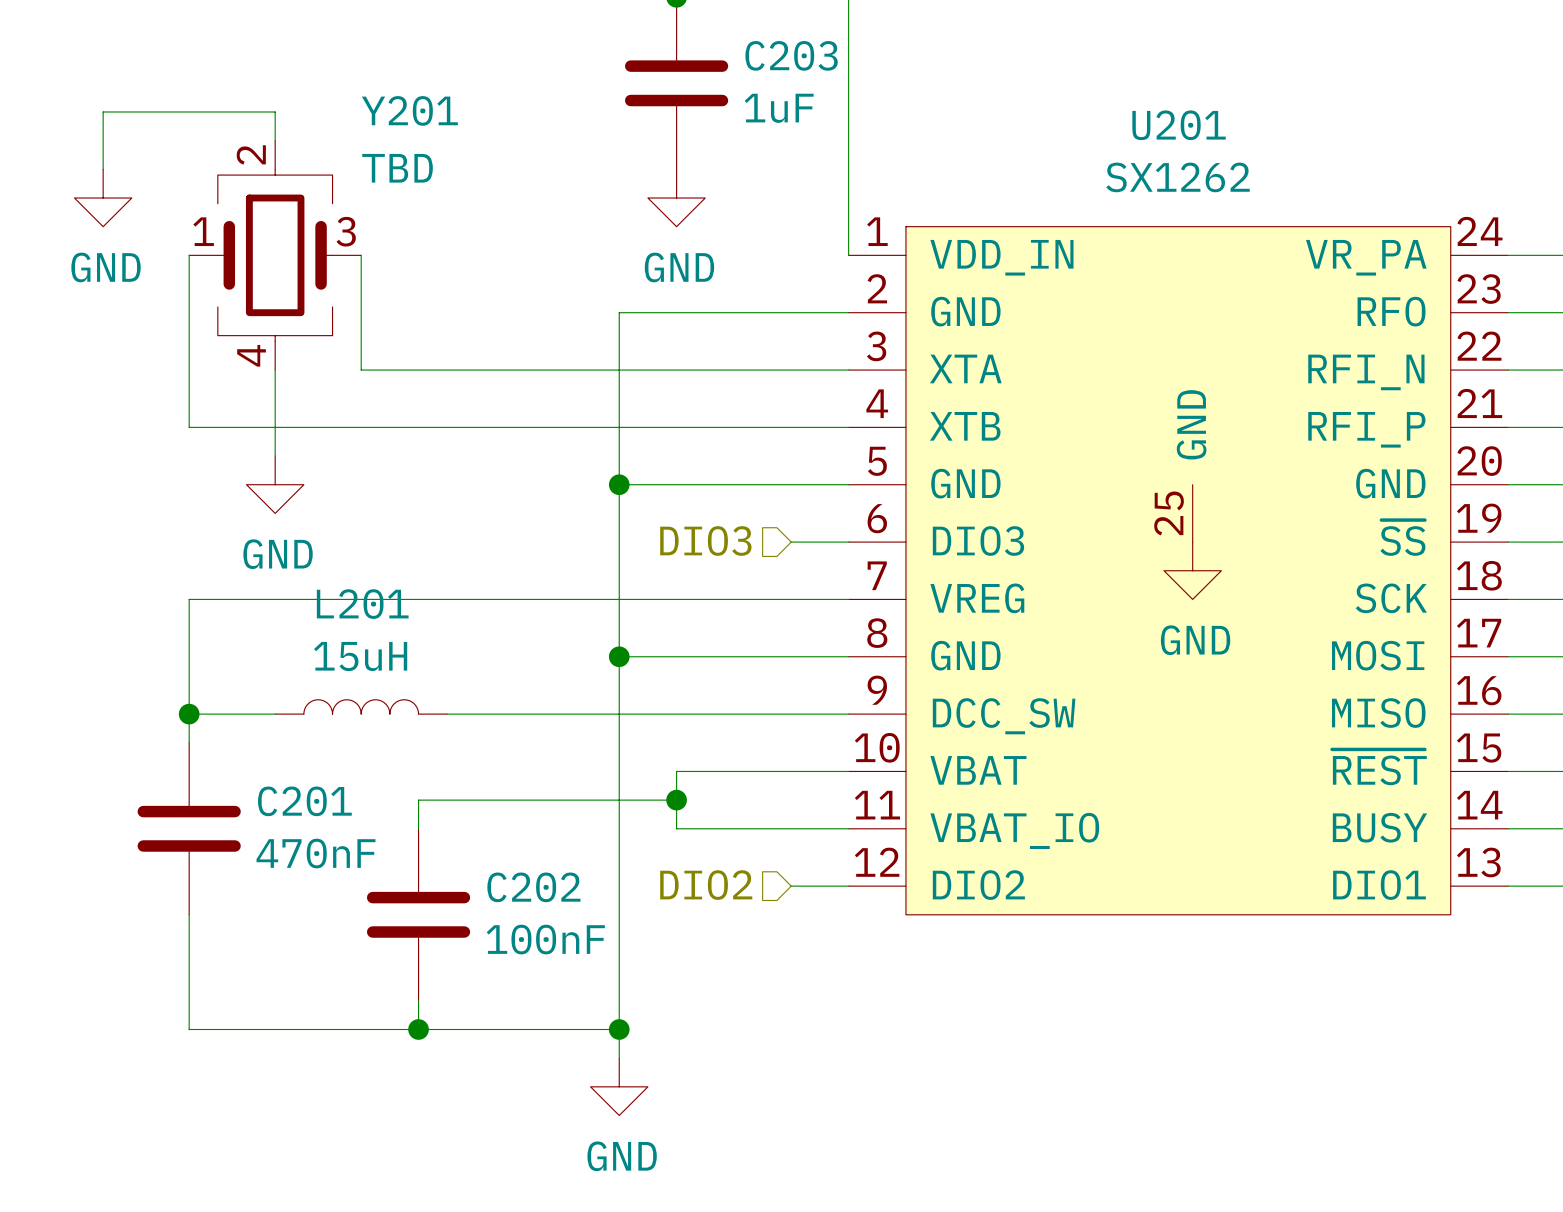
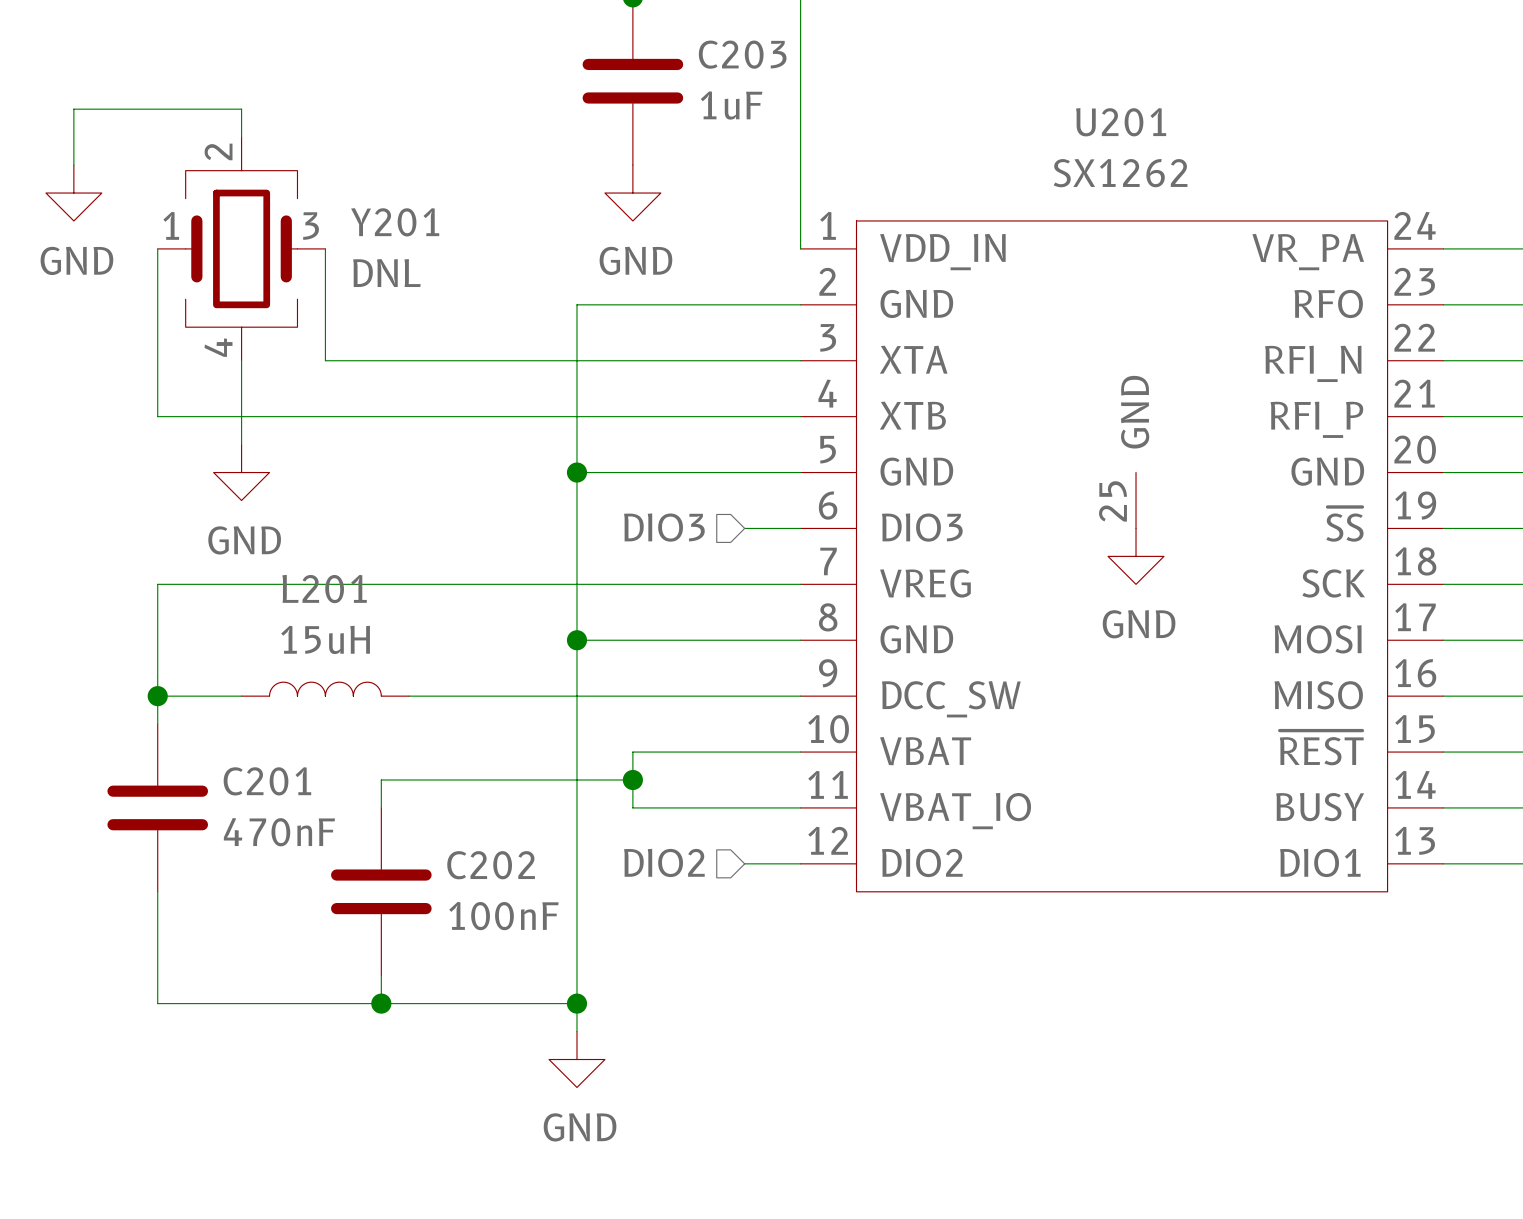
Y201 name position: Y201 (409, 110) -> Y201 (395, 222)
Y201 value: TBD (397, 168) -> DNL (386, 273)

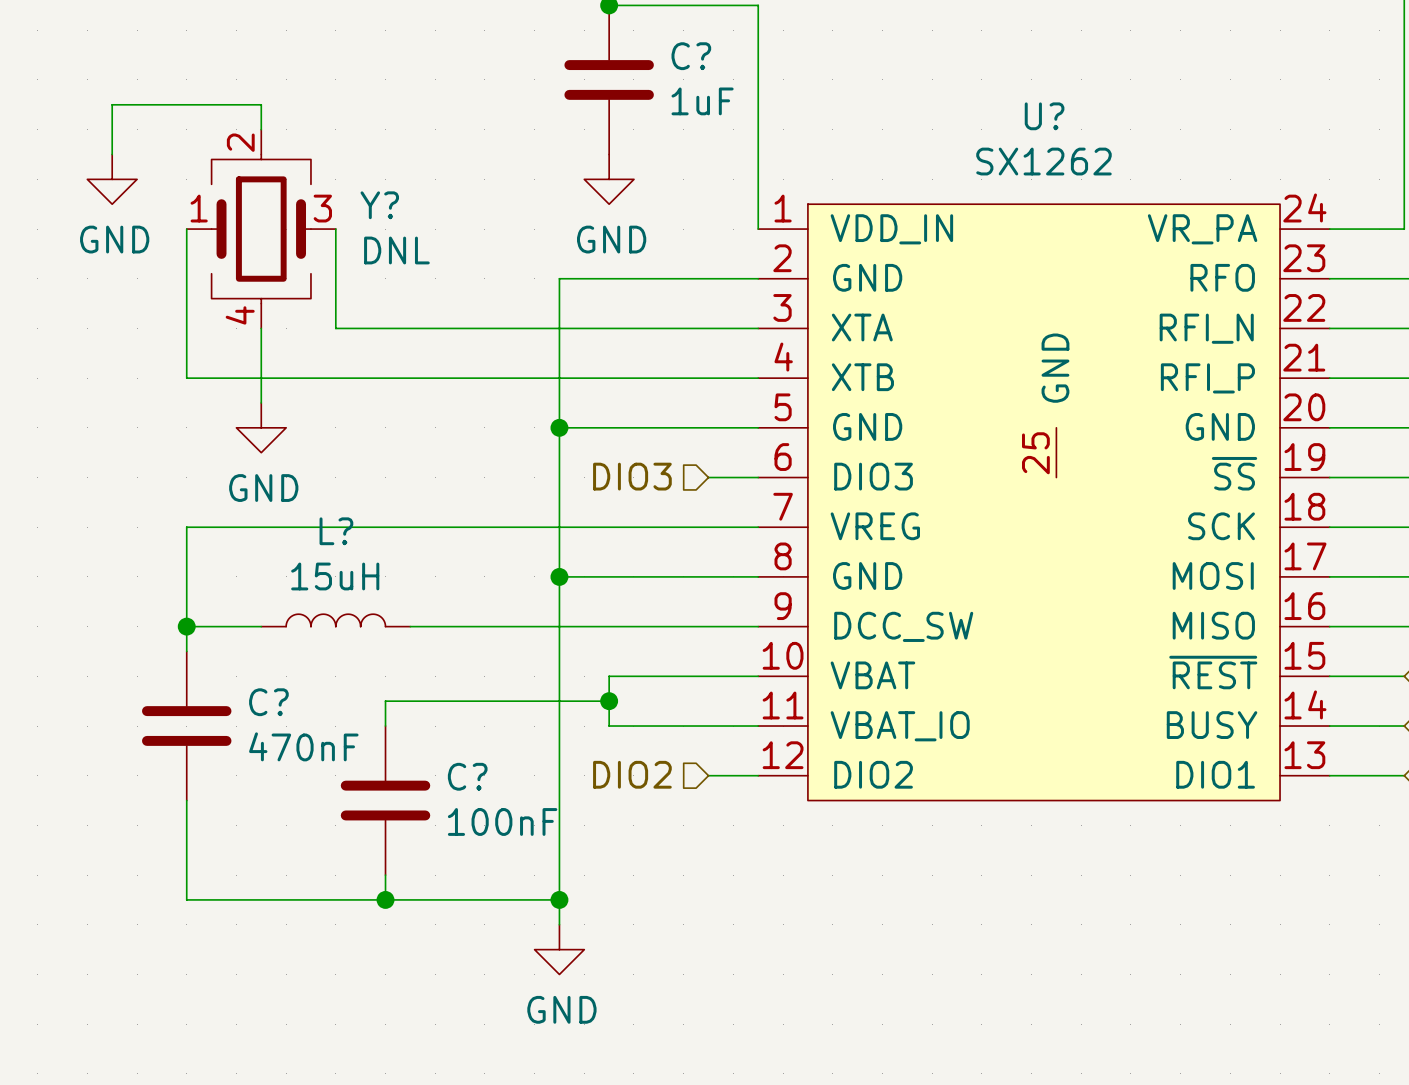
C203 name: C203 (742, 54) -> C? (691, 56)
U201 name: U201 (1121, 122) -> U? (1044, 116)
Y201 name: Y201 (395, 222) -> Y? (379, 205)
power symbol: GND (1136, 556) -> none
L201 name: L201 (324, 589) -> L? (336, 531)
C201 name: C201 (267, 781) -> C? (268, 702)
C202 name: C202 (491, 865) -> C? (467, 776)

